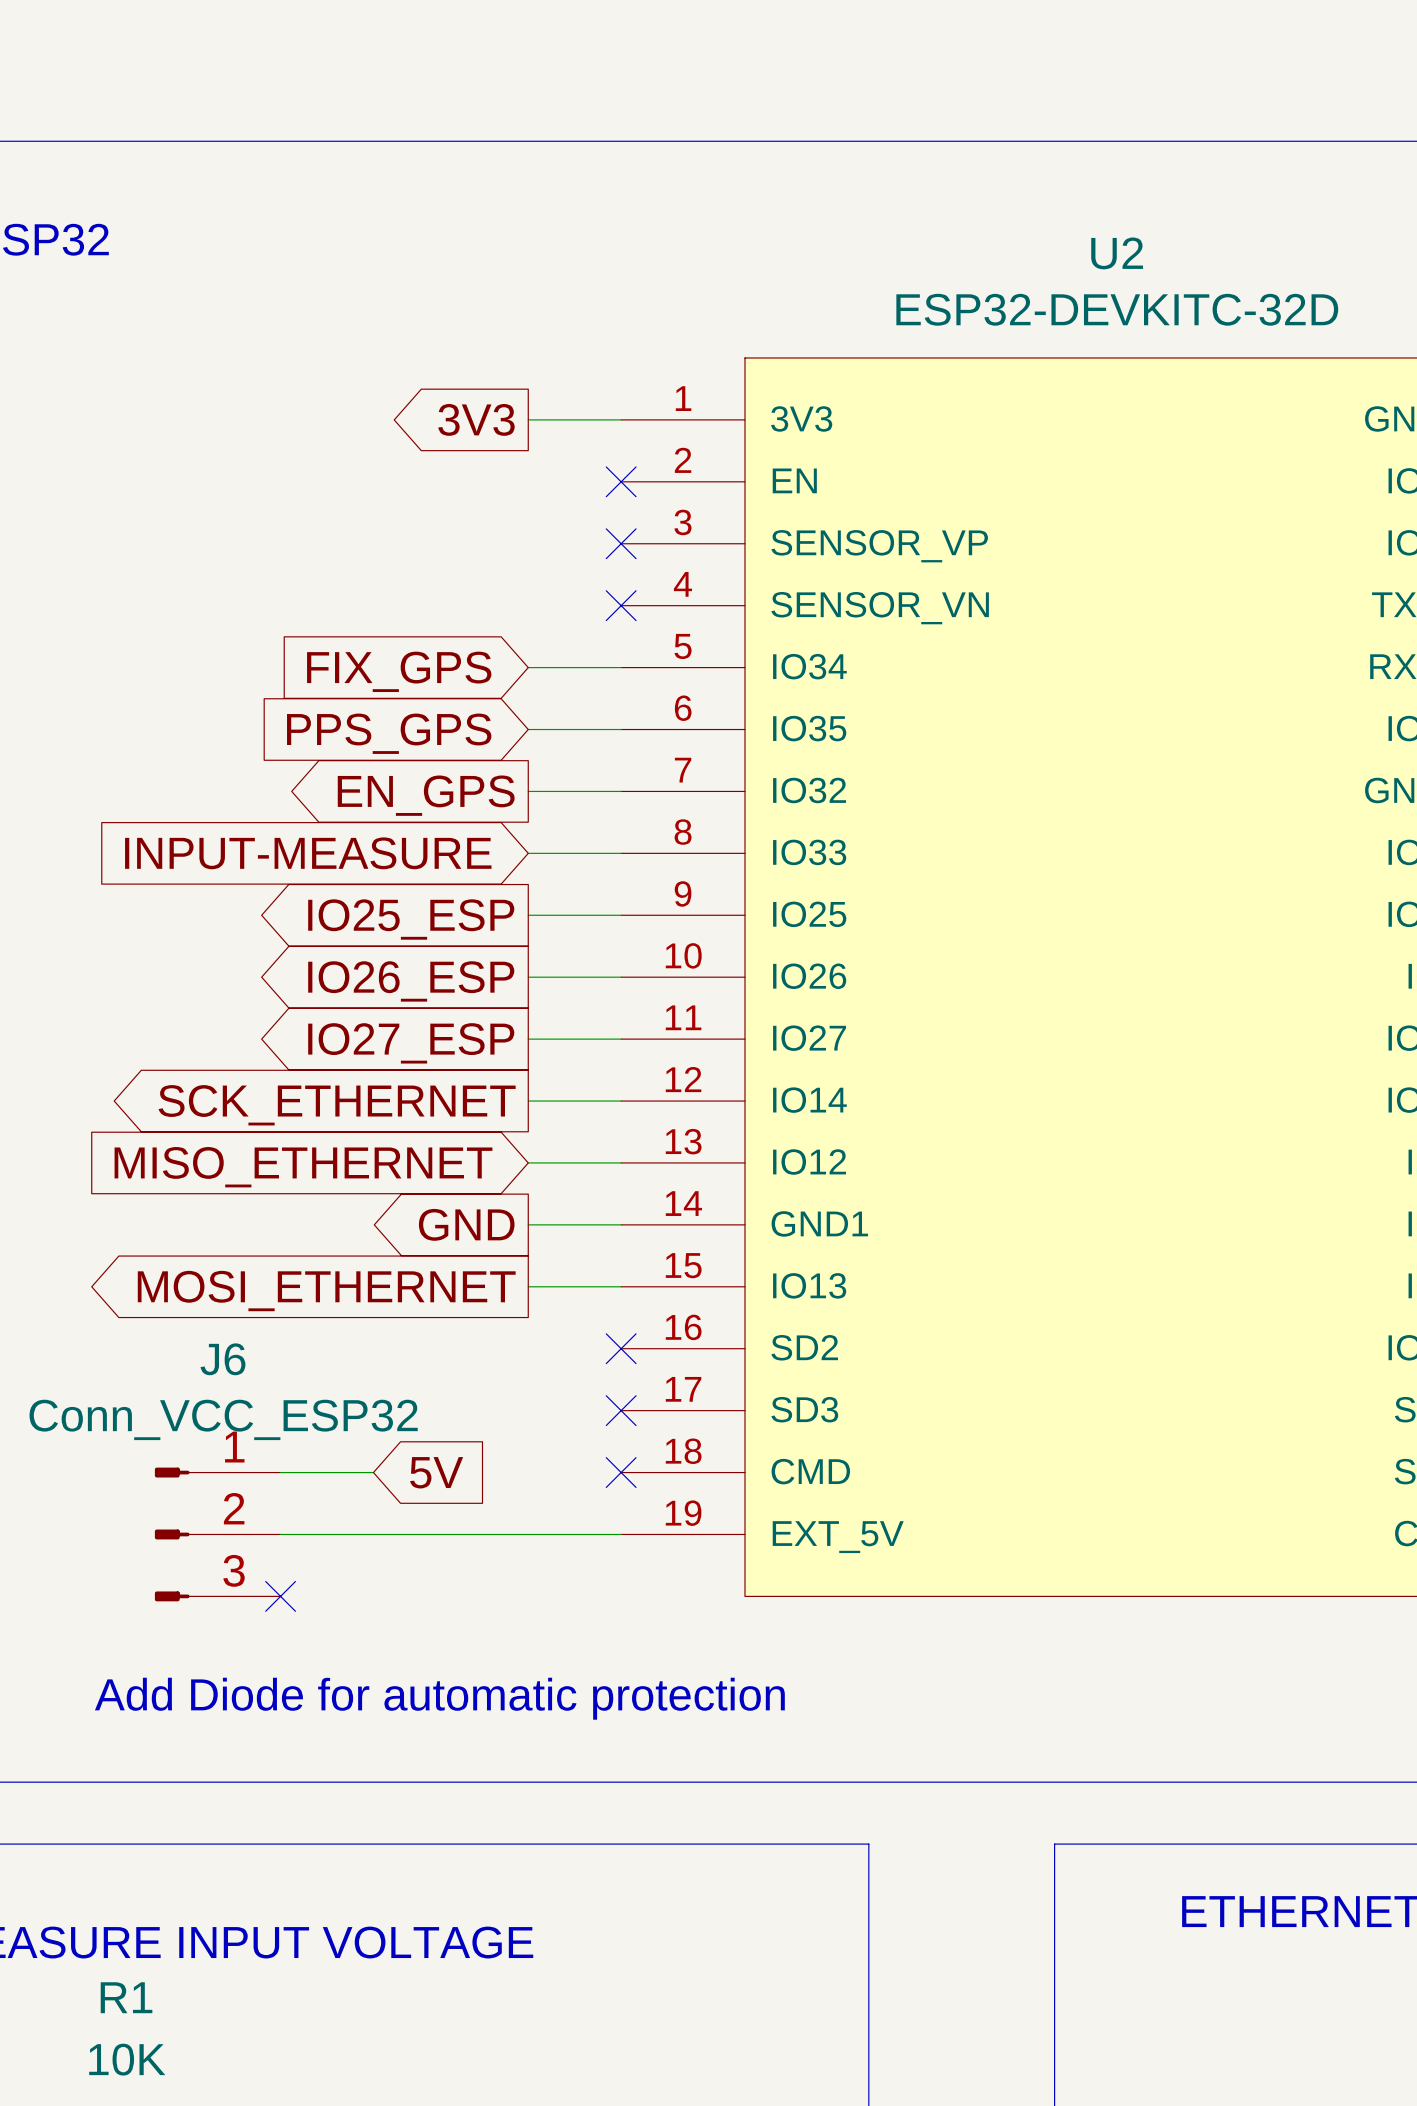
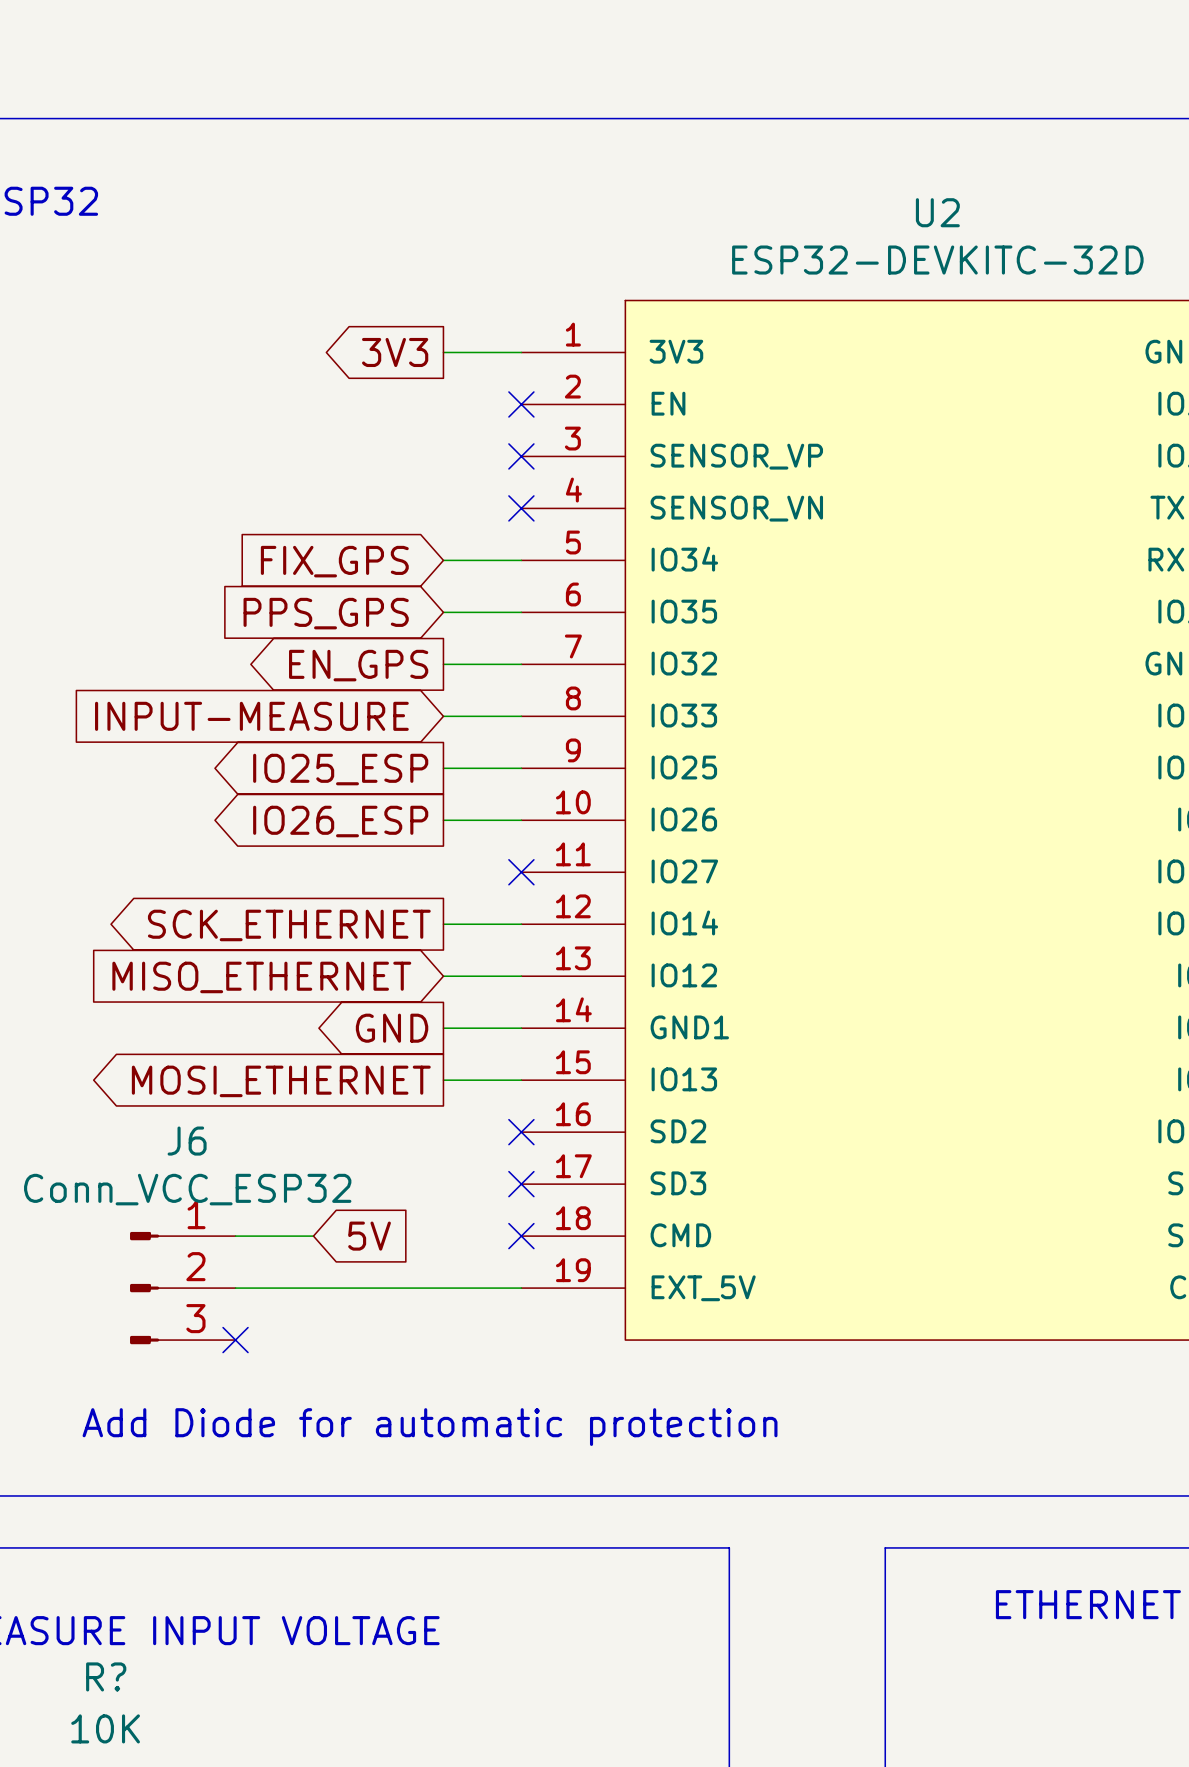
wire: (528, 1039) (621, 1039) -> none
no-connect mark: none -> (521, 872)
global label: IO27_ESP (411, 1043) -> none
R1 name: R1 (126, 1997) -> R? (106, 1676)

